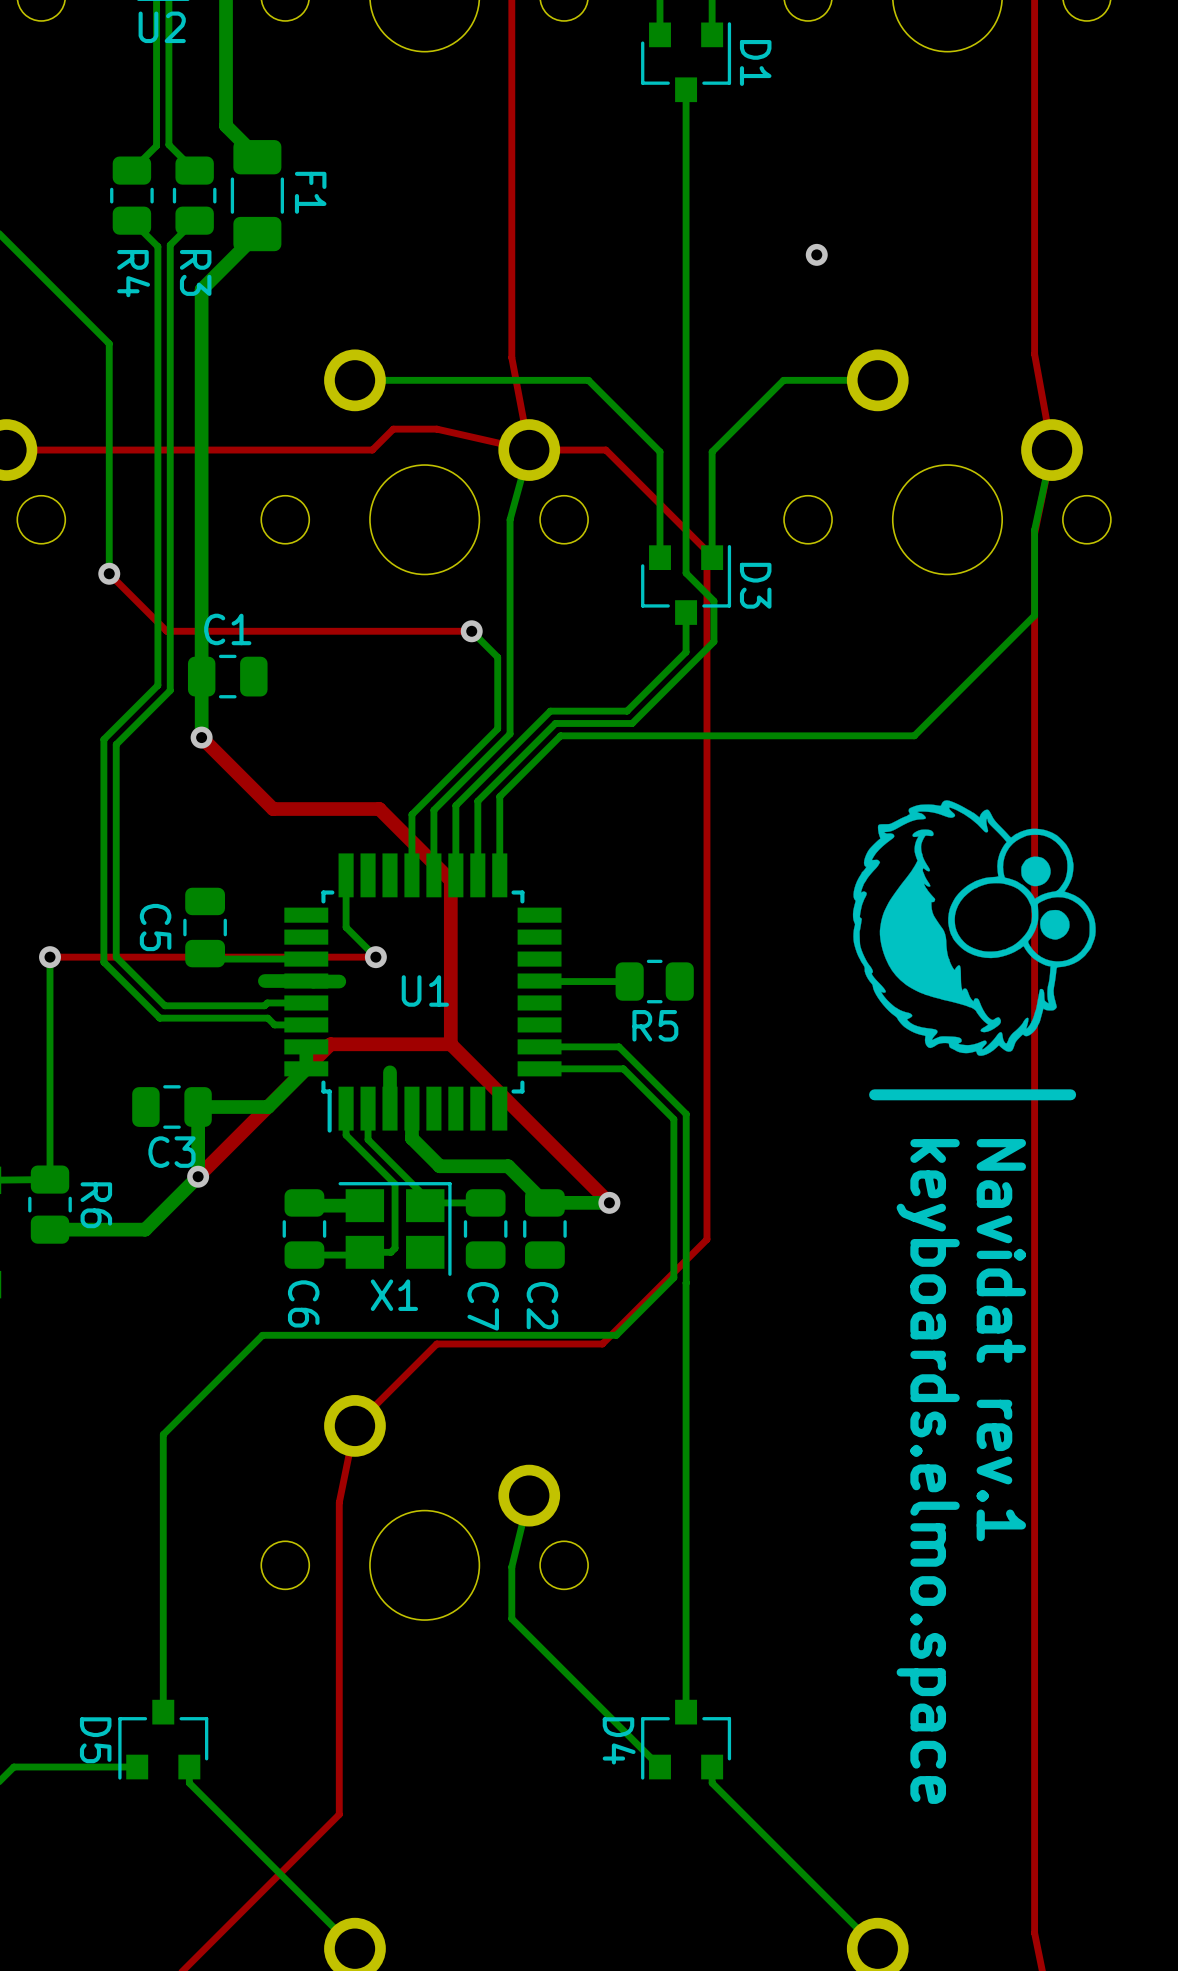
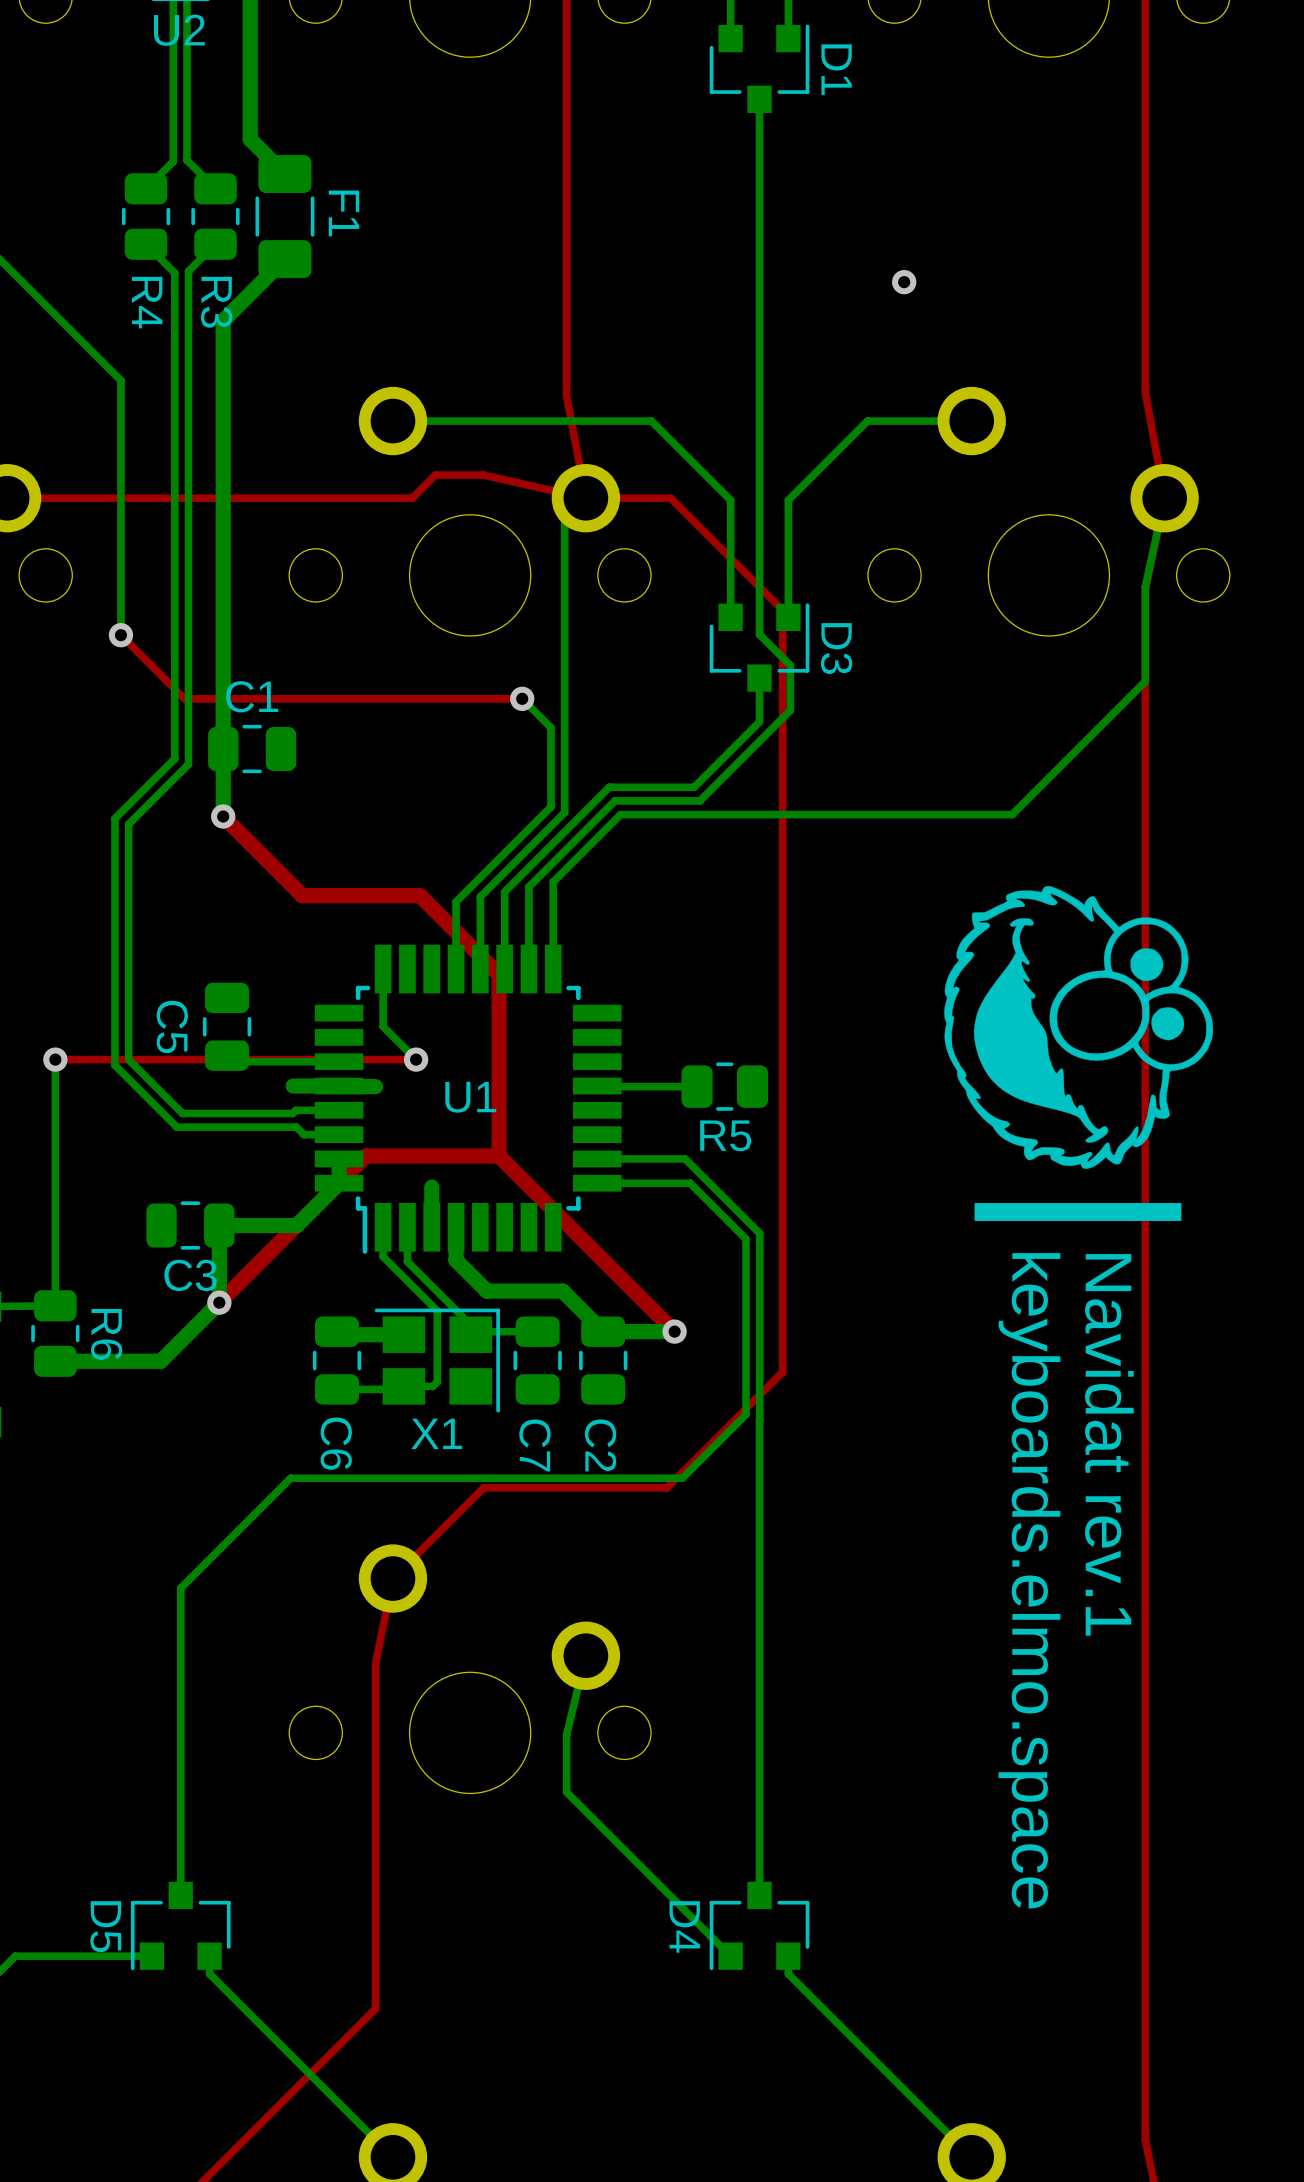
bottom track: (529, 450) (510, 519) -> (585, 498) (564, 519) (564, 575)

